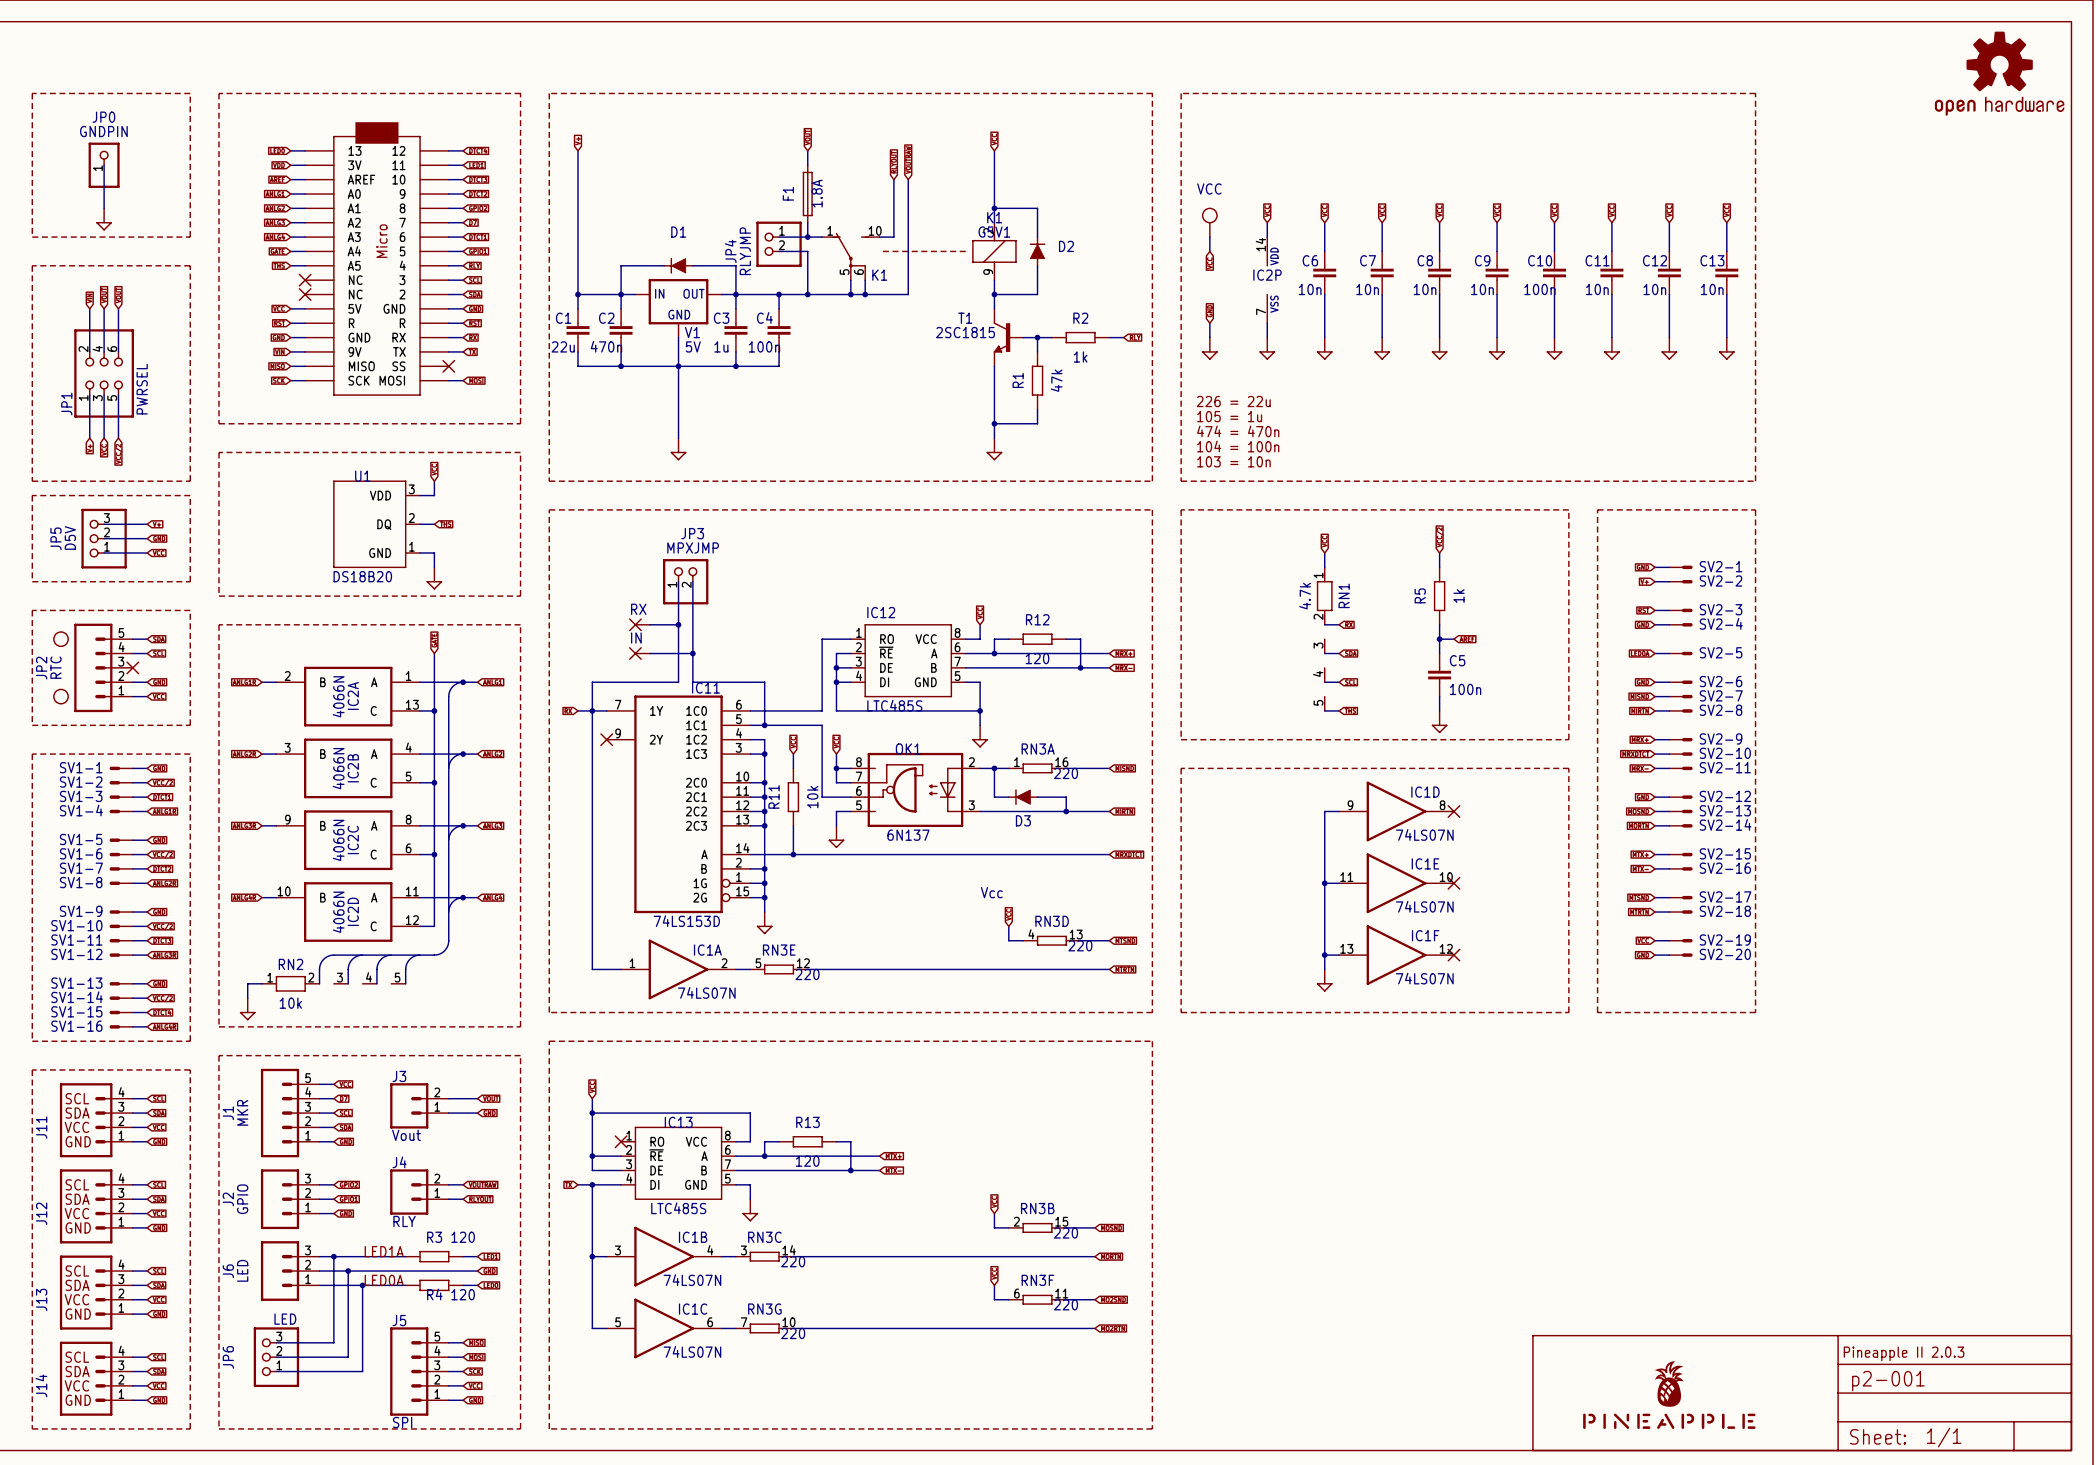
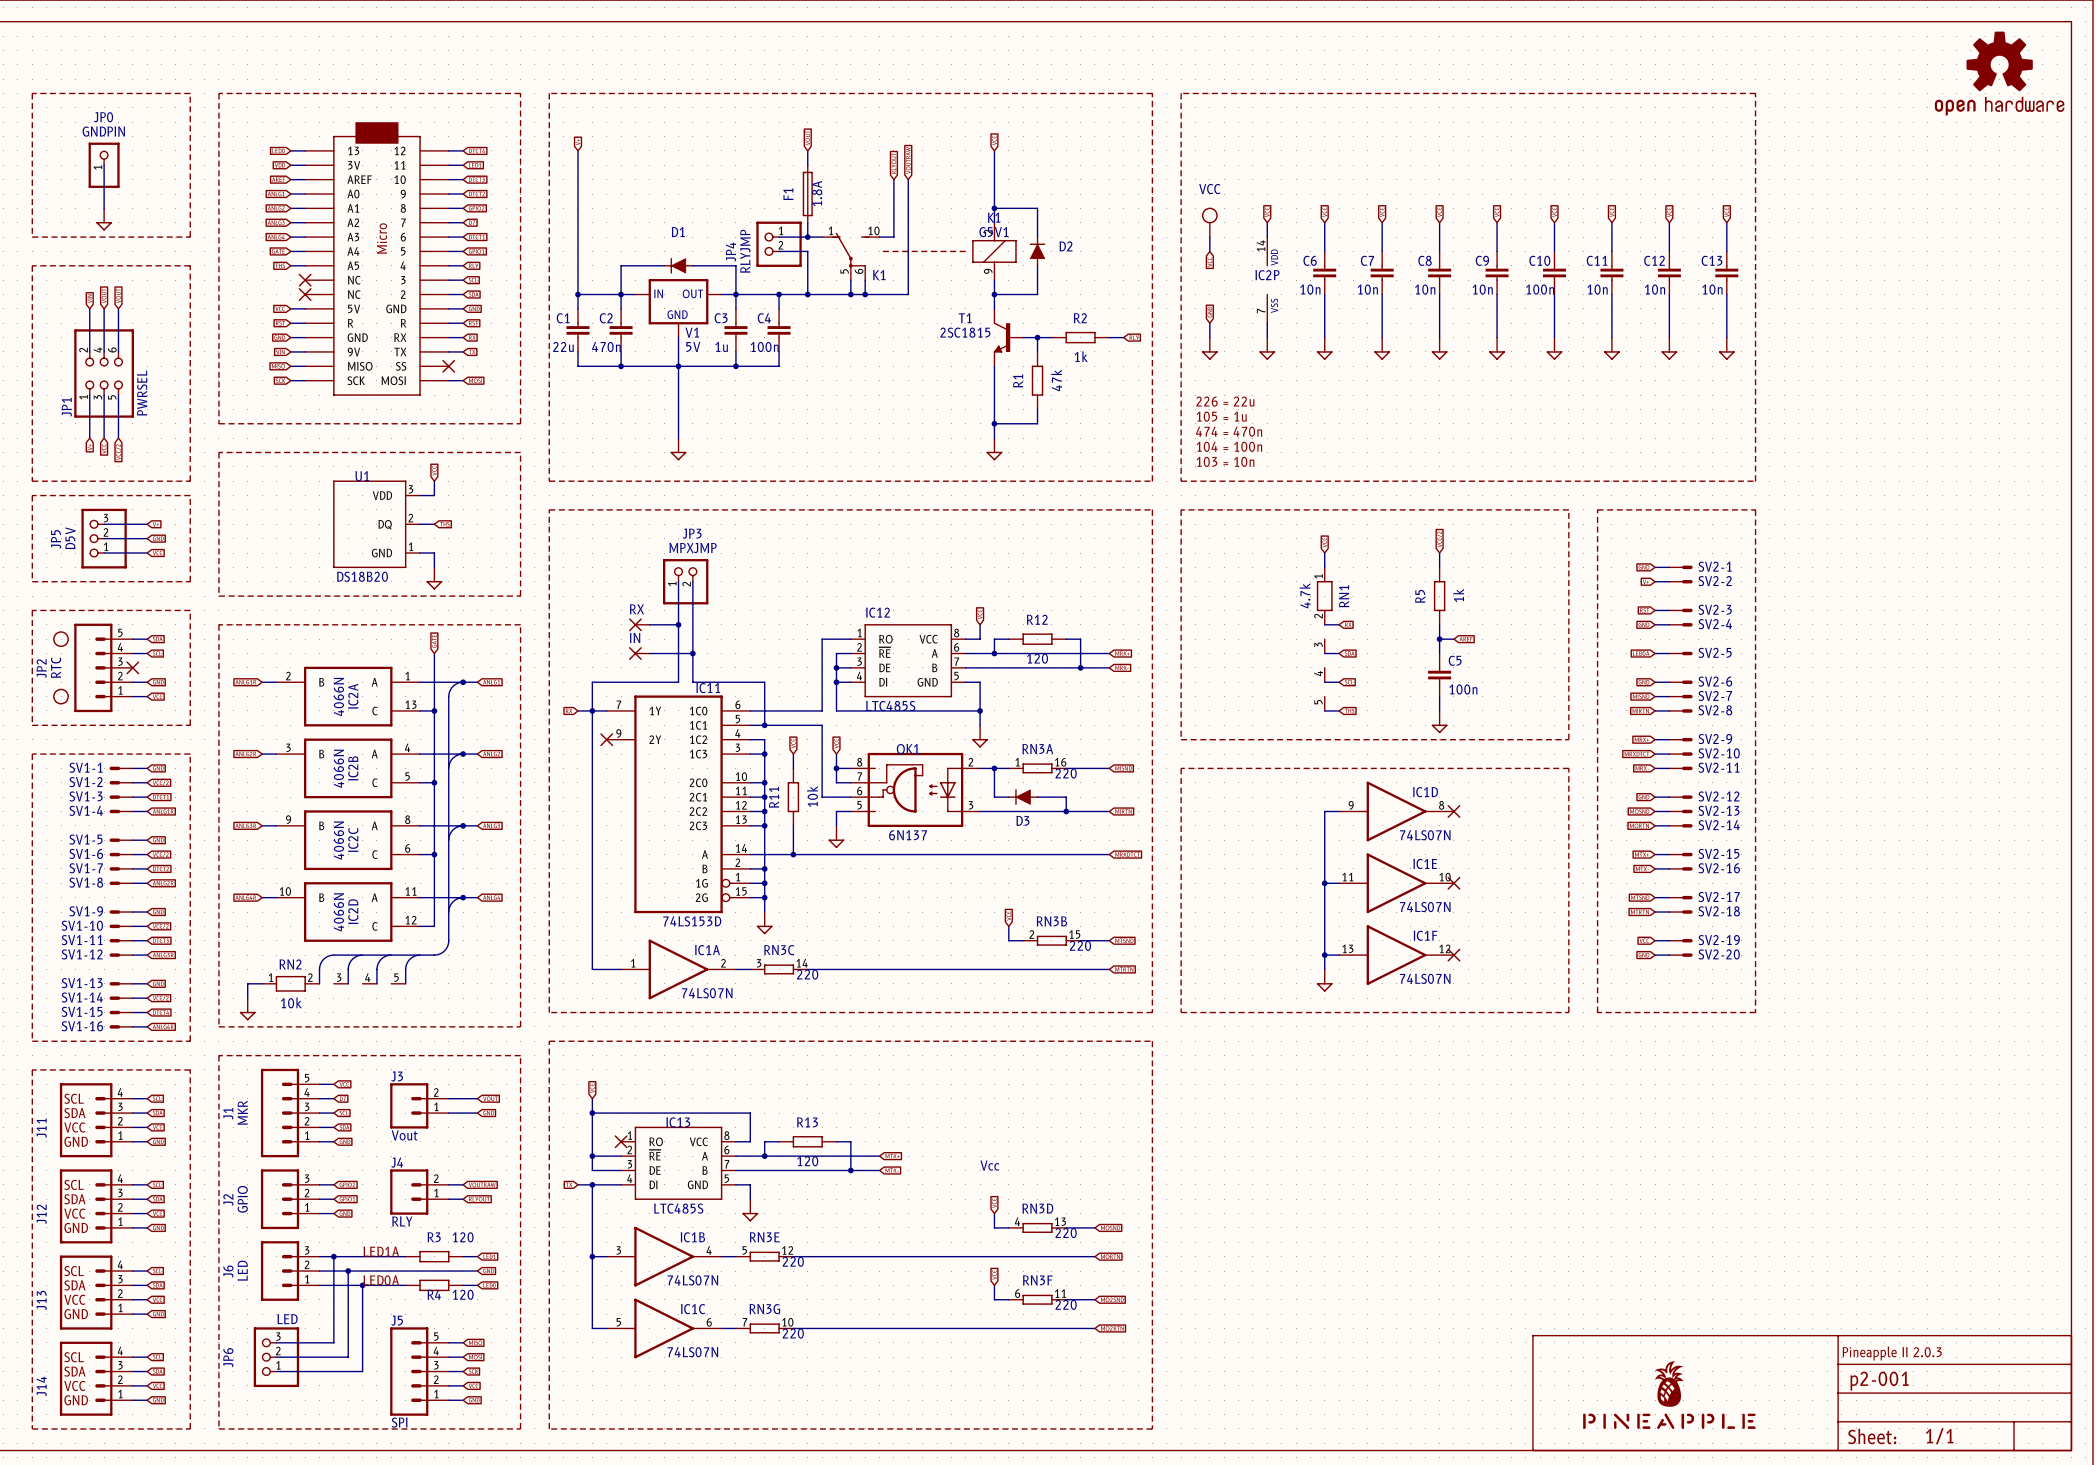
text: Vcc (991, 892) -> none
RN3D position: (1051, 940) -> (1037, 1227)
RN3E position: (779, 969) -> (764, 1256)
text: none -> Vcc (989, 1165)
RN3B position: (1037, 1227) -> (1051, 940)
RN3C position: (764, 1256) -> (779, 969)

